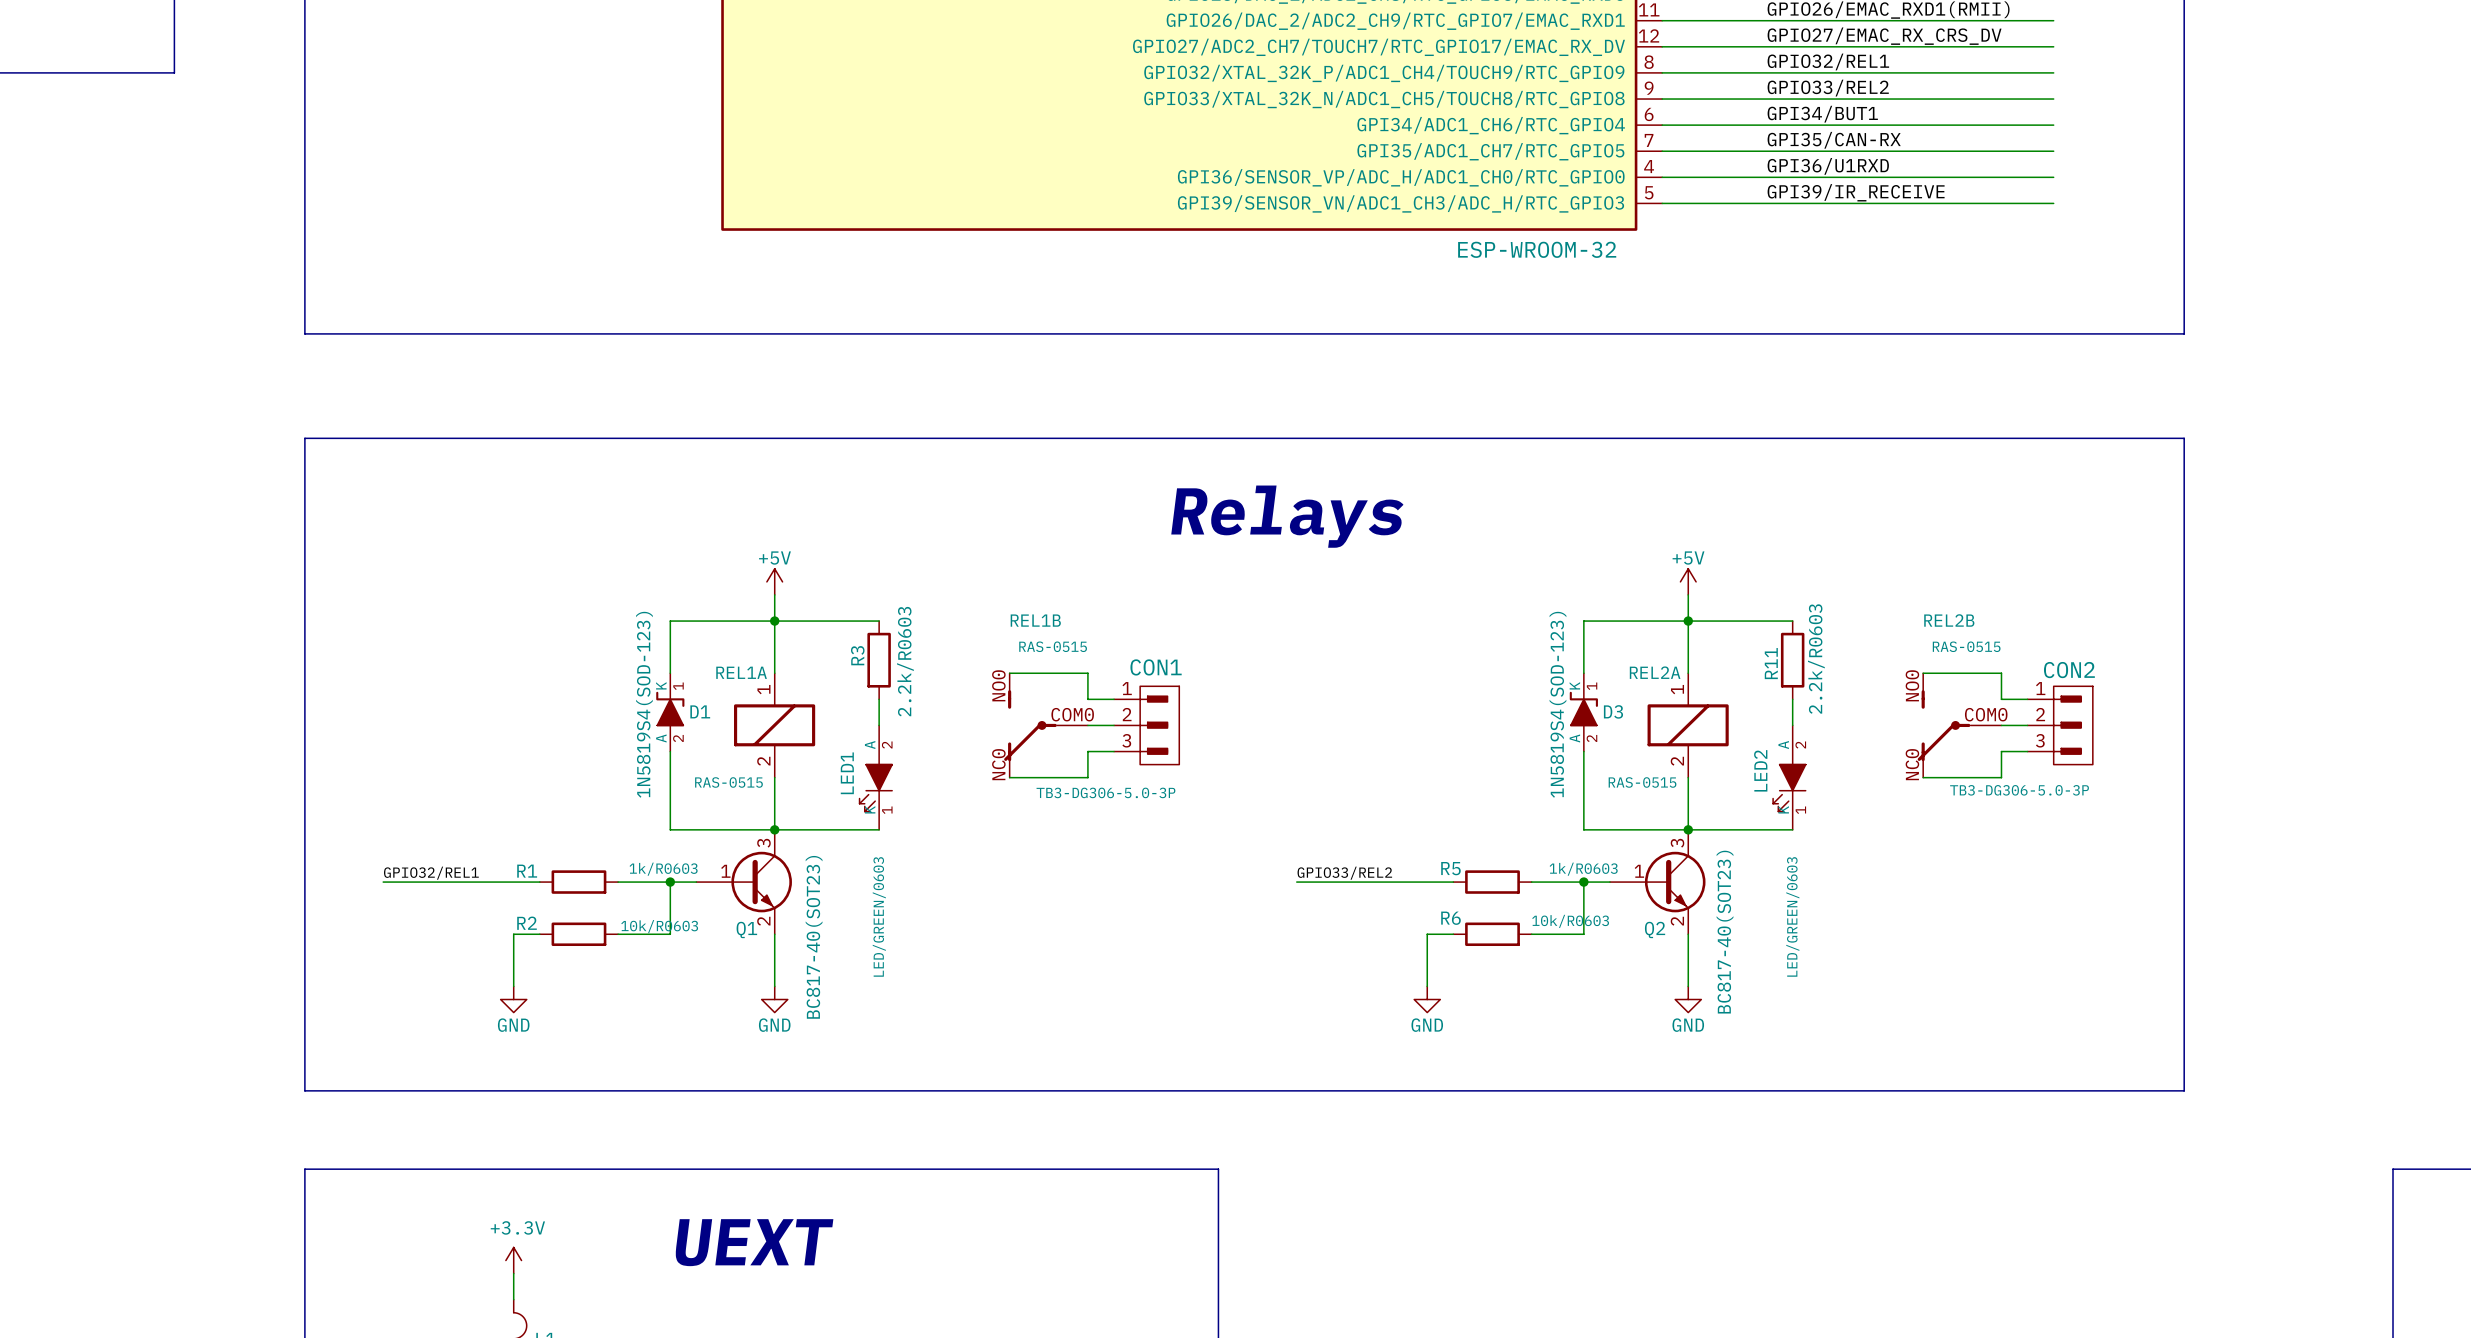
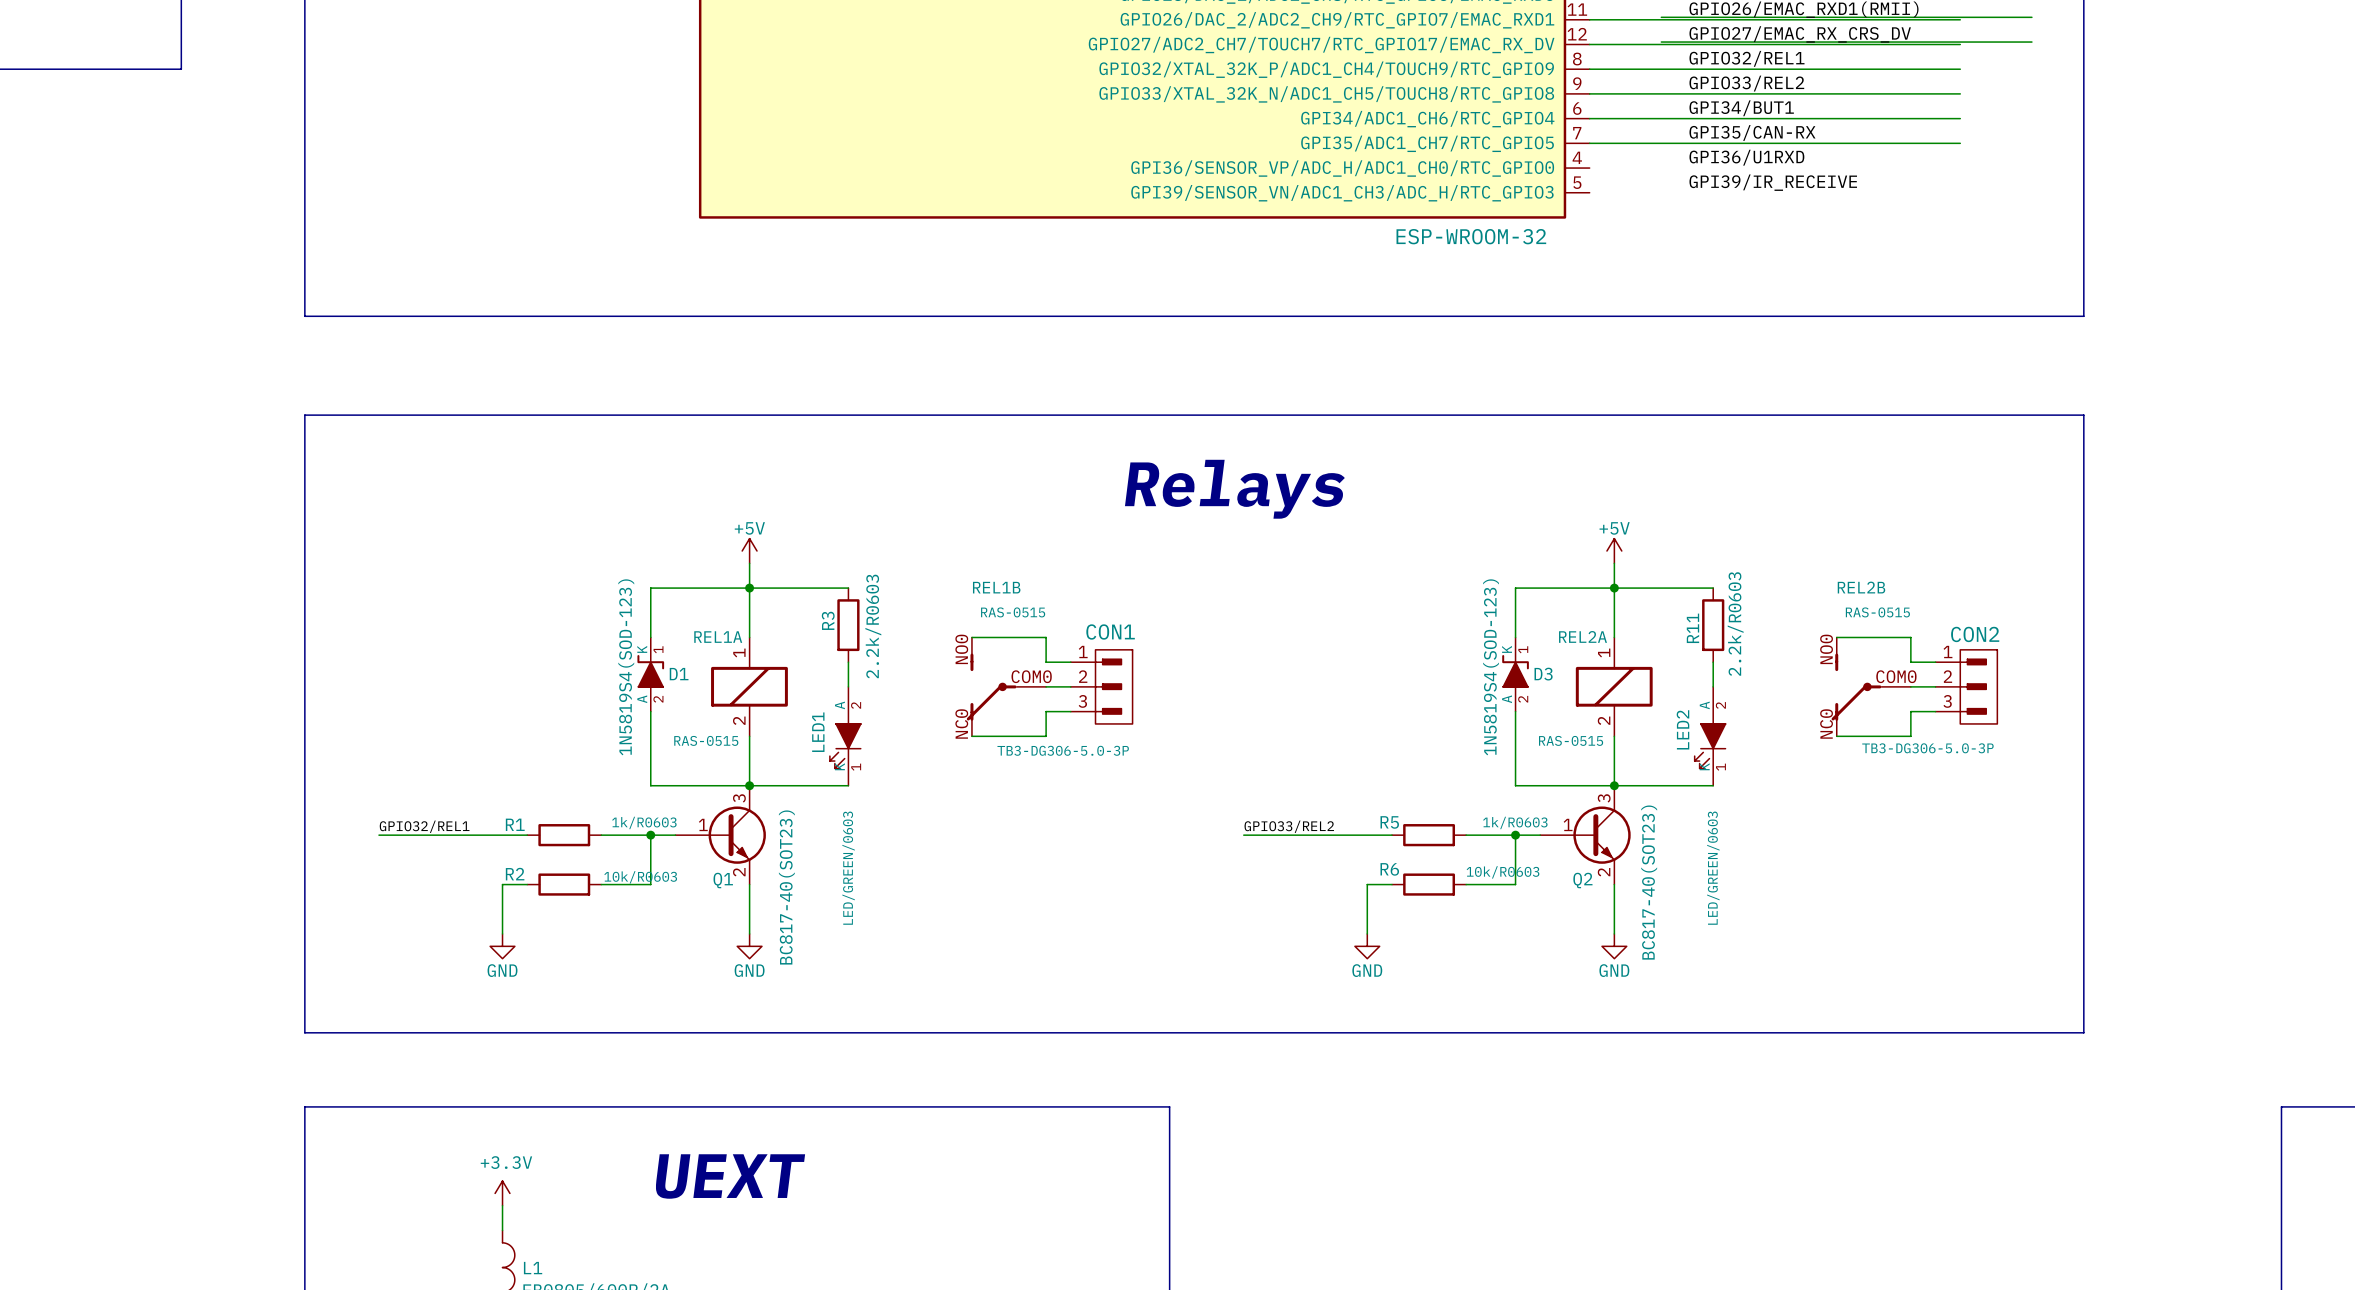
wire: (1662, 177) (2053, 177) -> (1661, 17) (2031, 17)
wire: (1662, 203) (2053, 203) -> (1661, 42) (2031, 42)

